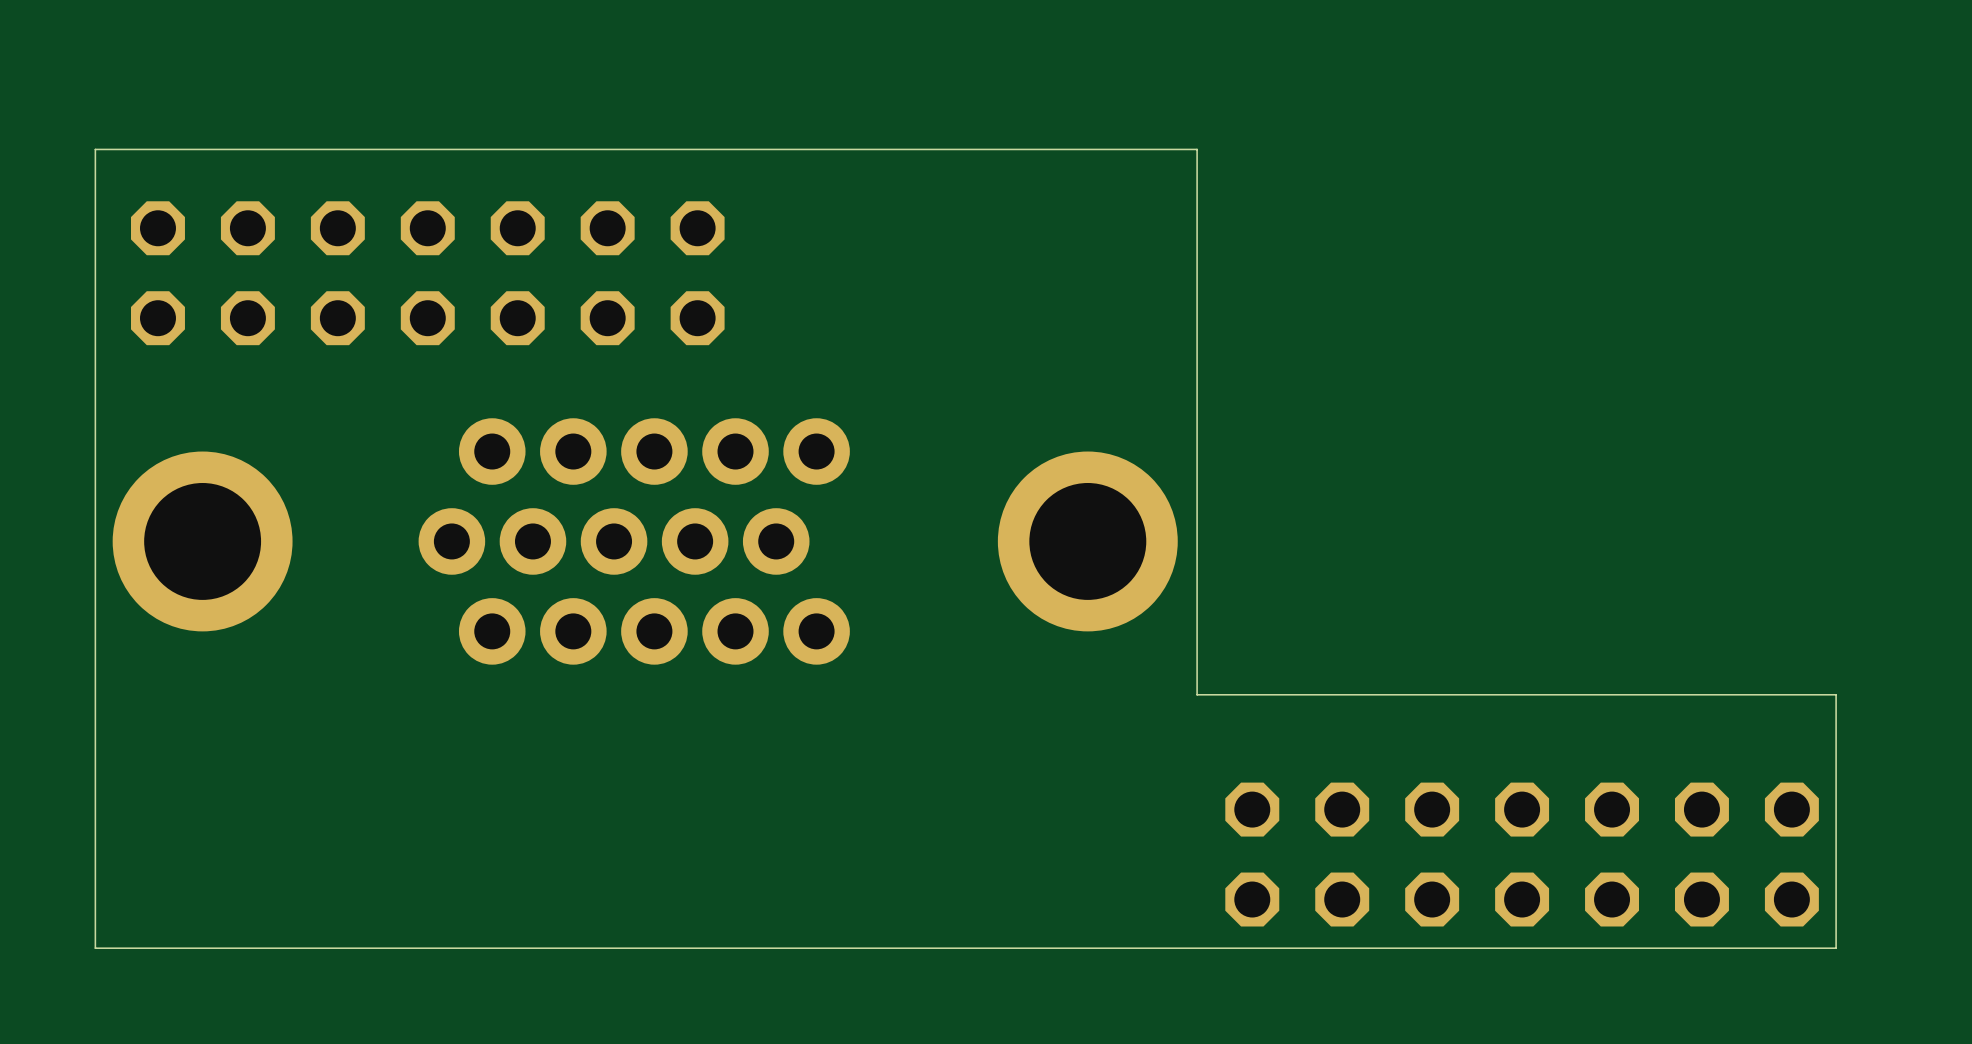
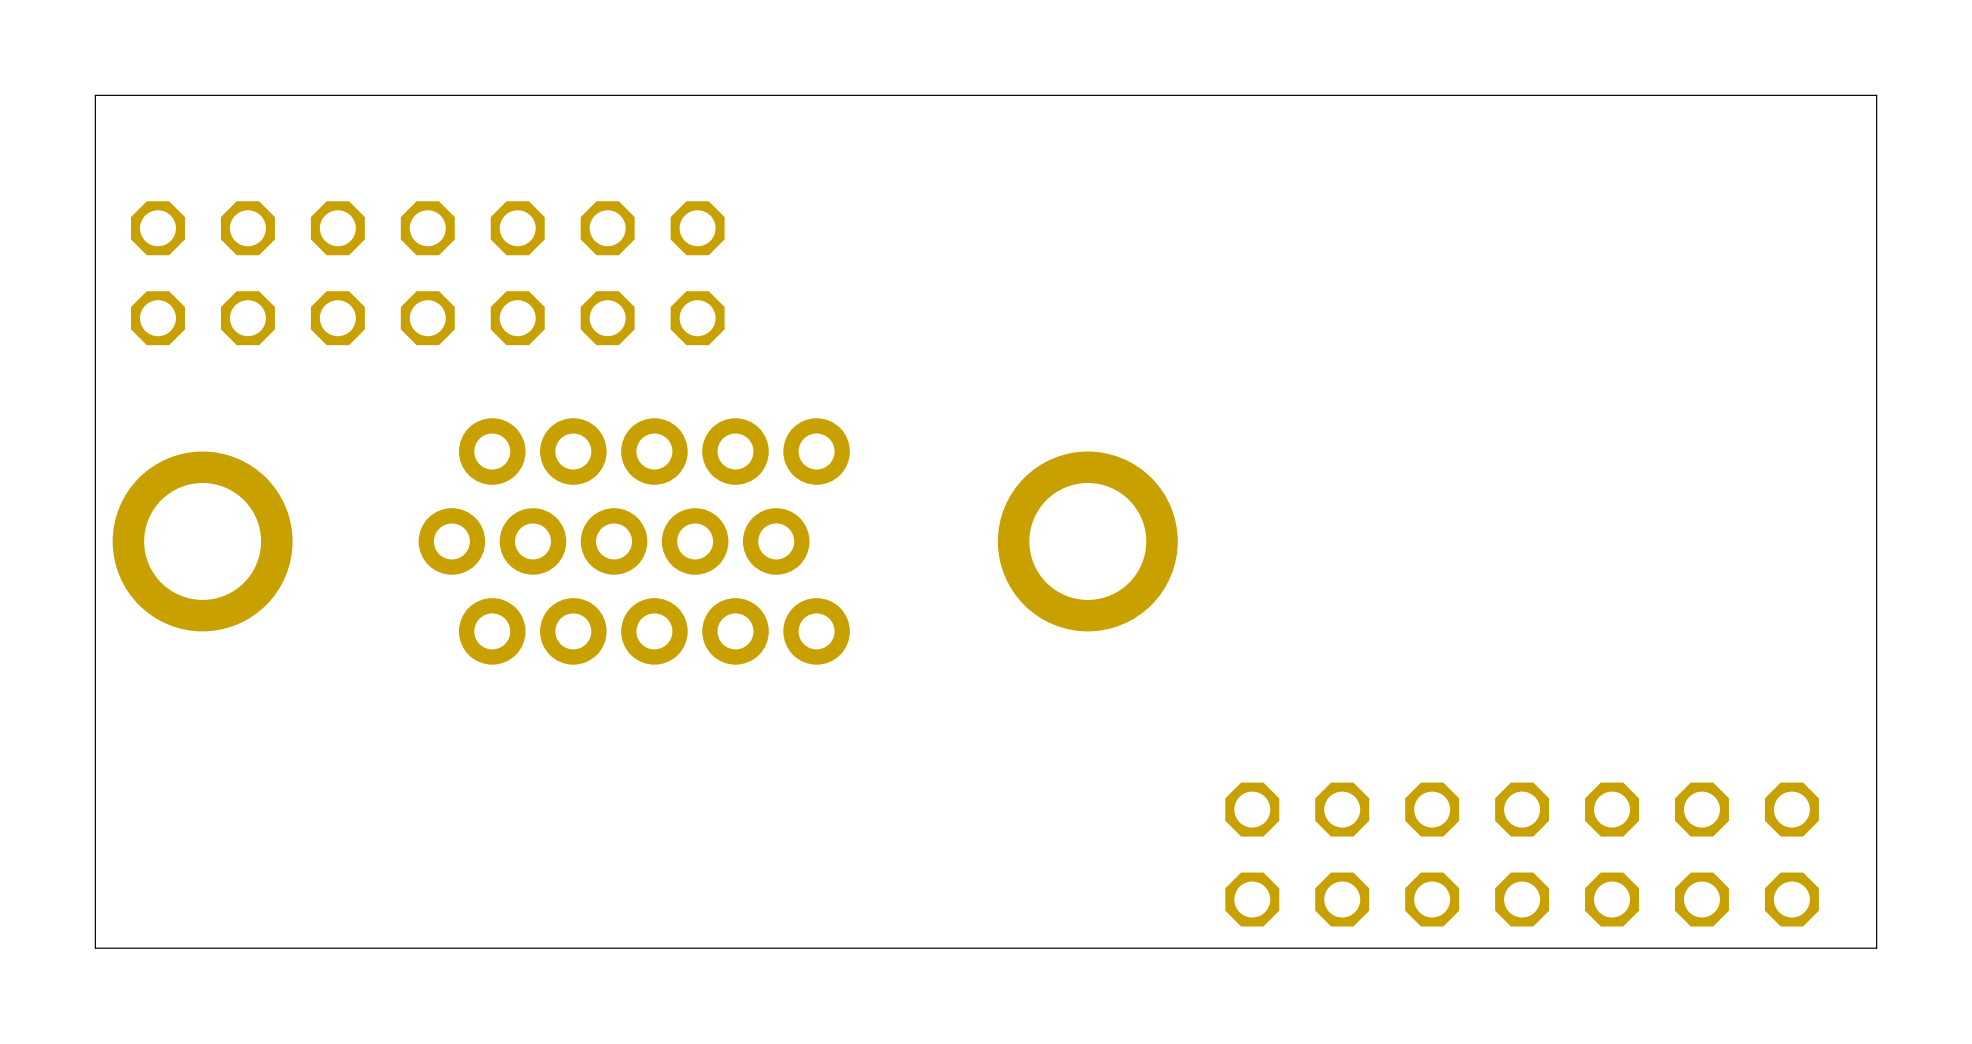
board edge: (95, 149) (1197, 149) (1197, 694) (1836, 694) (1836, 948) -> (95, 149) (95, 95) (1876, 95) (1876, 948) (1836, 948)

